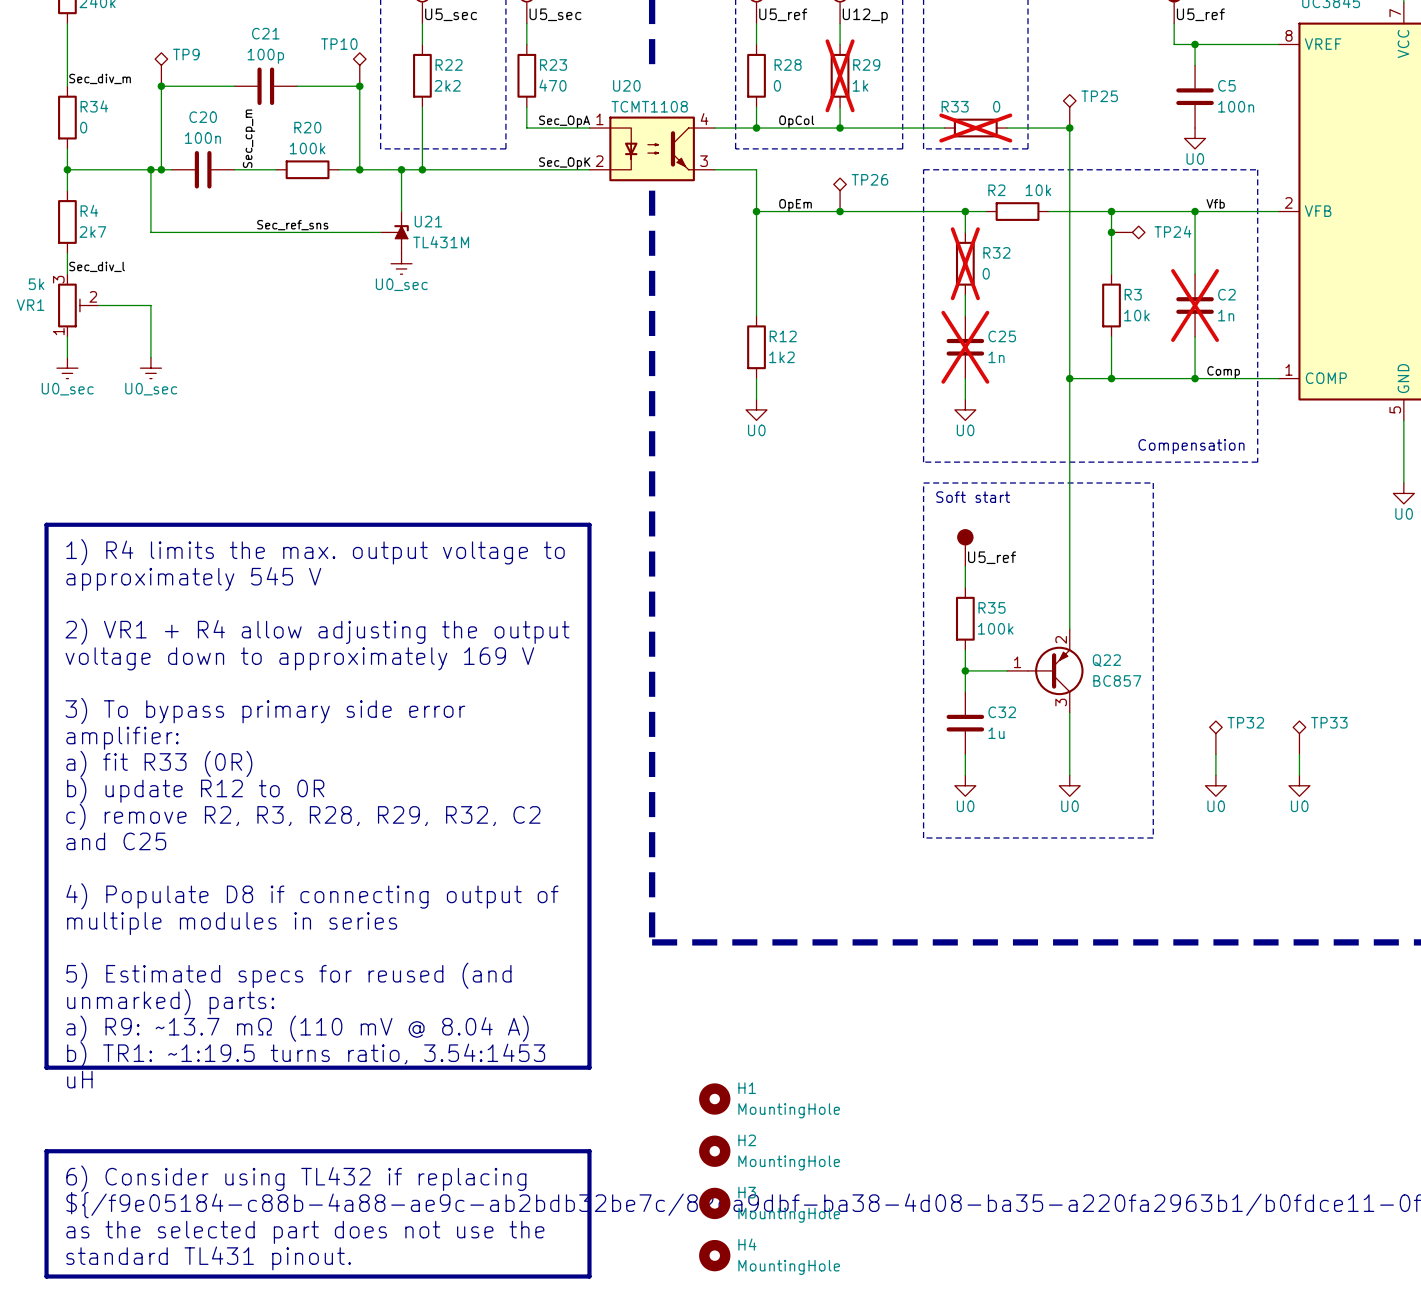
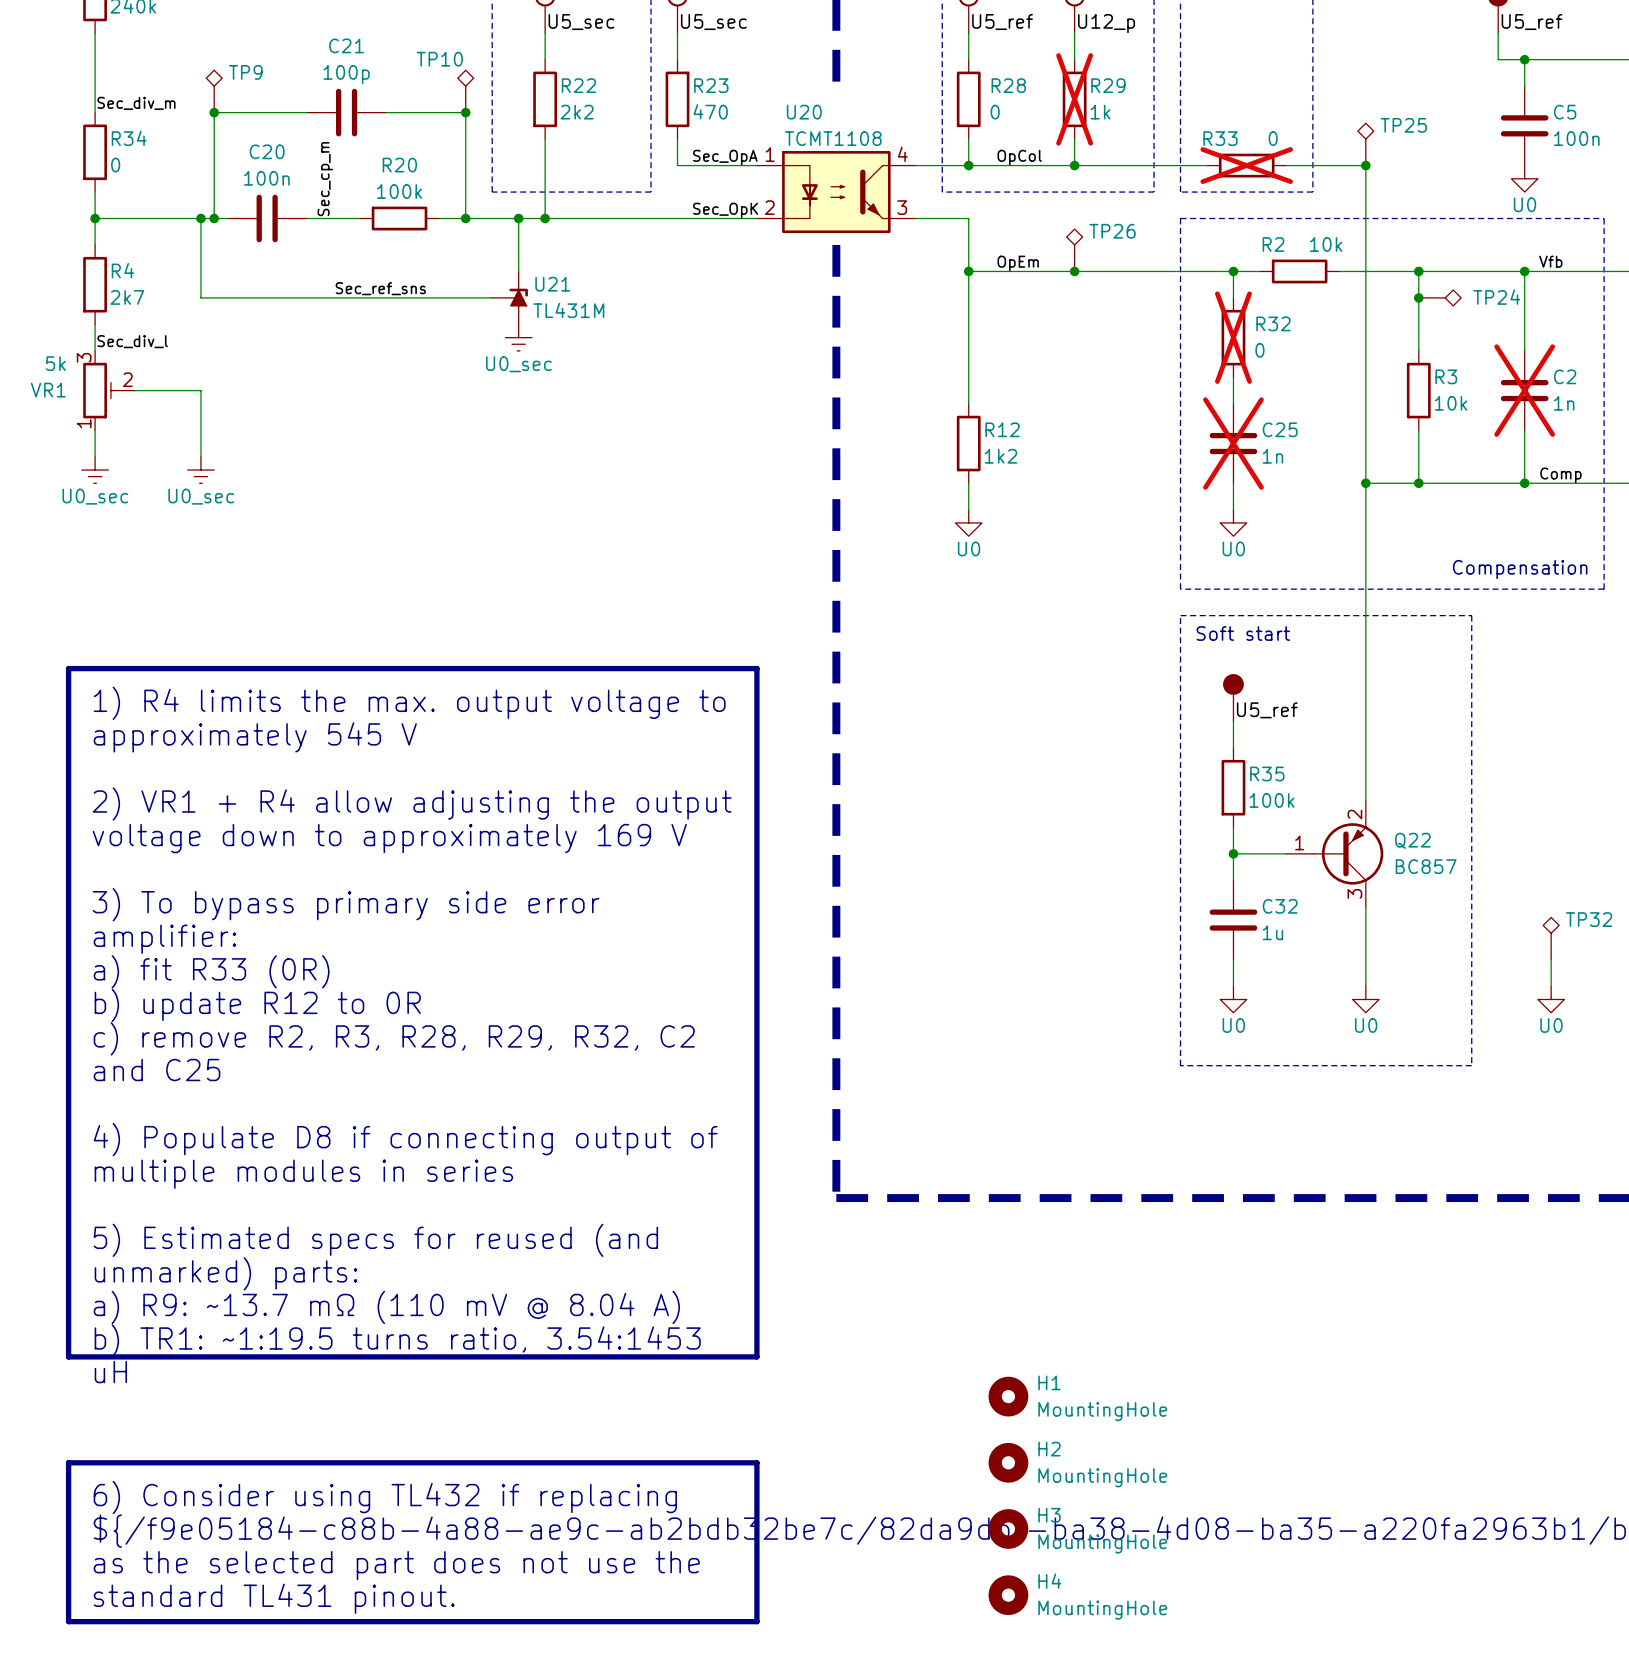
H1 position: (714, 1099) -> (1008, 1396)
H2 position: (714, 1151) -> (1008, 1462)
H3 position: (714, 1203) -> (1008, 1528)
H4 position: (714, 1255) -> (1008, 1595)

